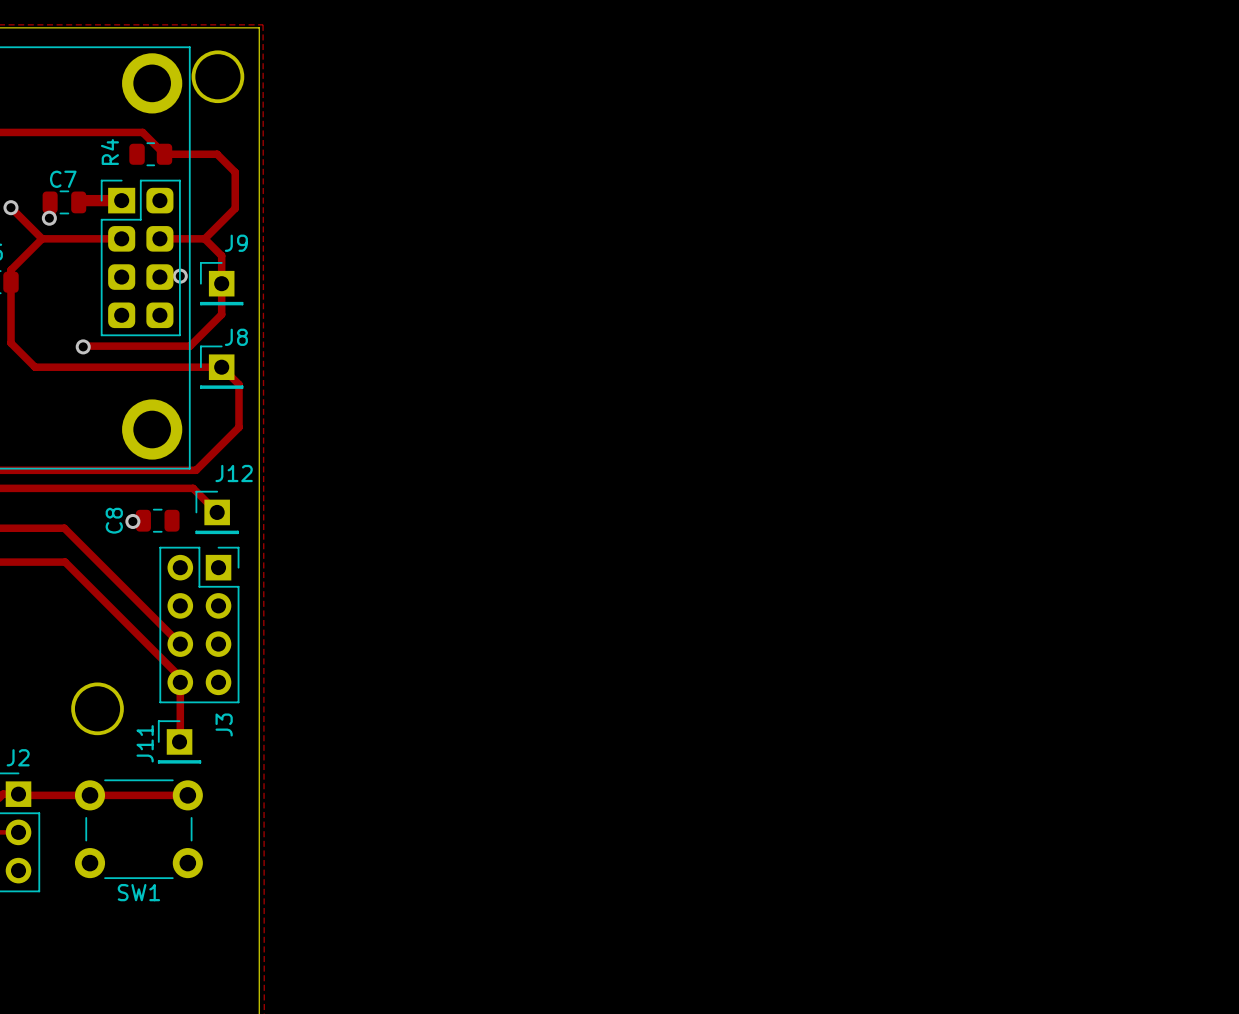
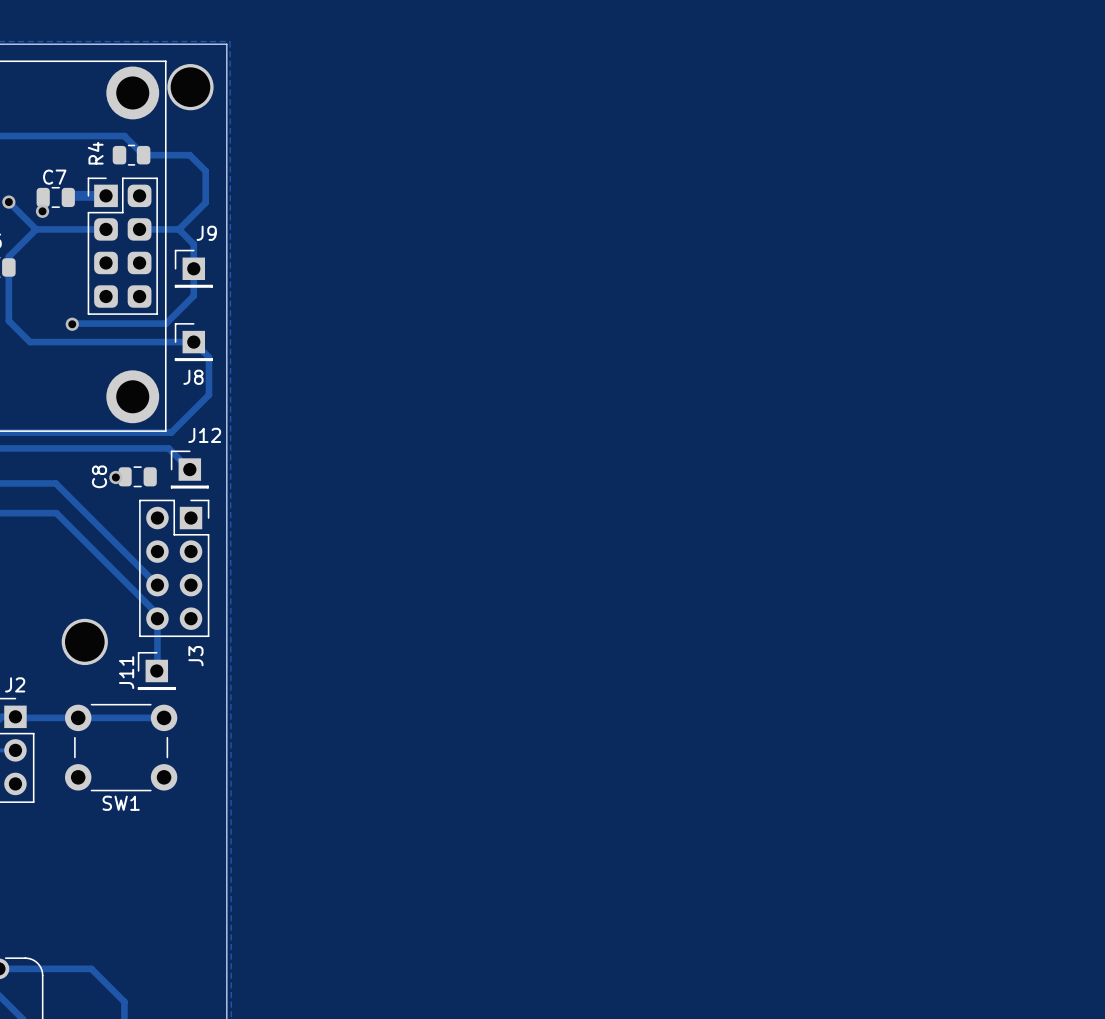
via: (180, 276) -> none
J8 name position: J8 (236, 337) -> J8 (193, 377)

